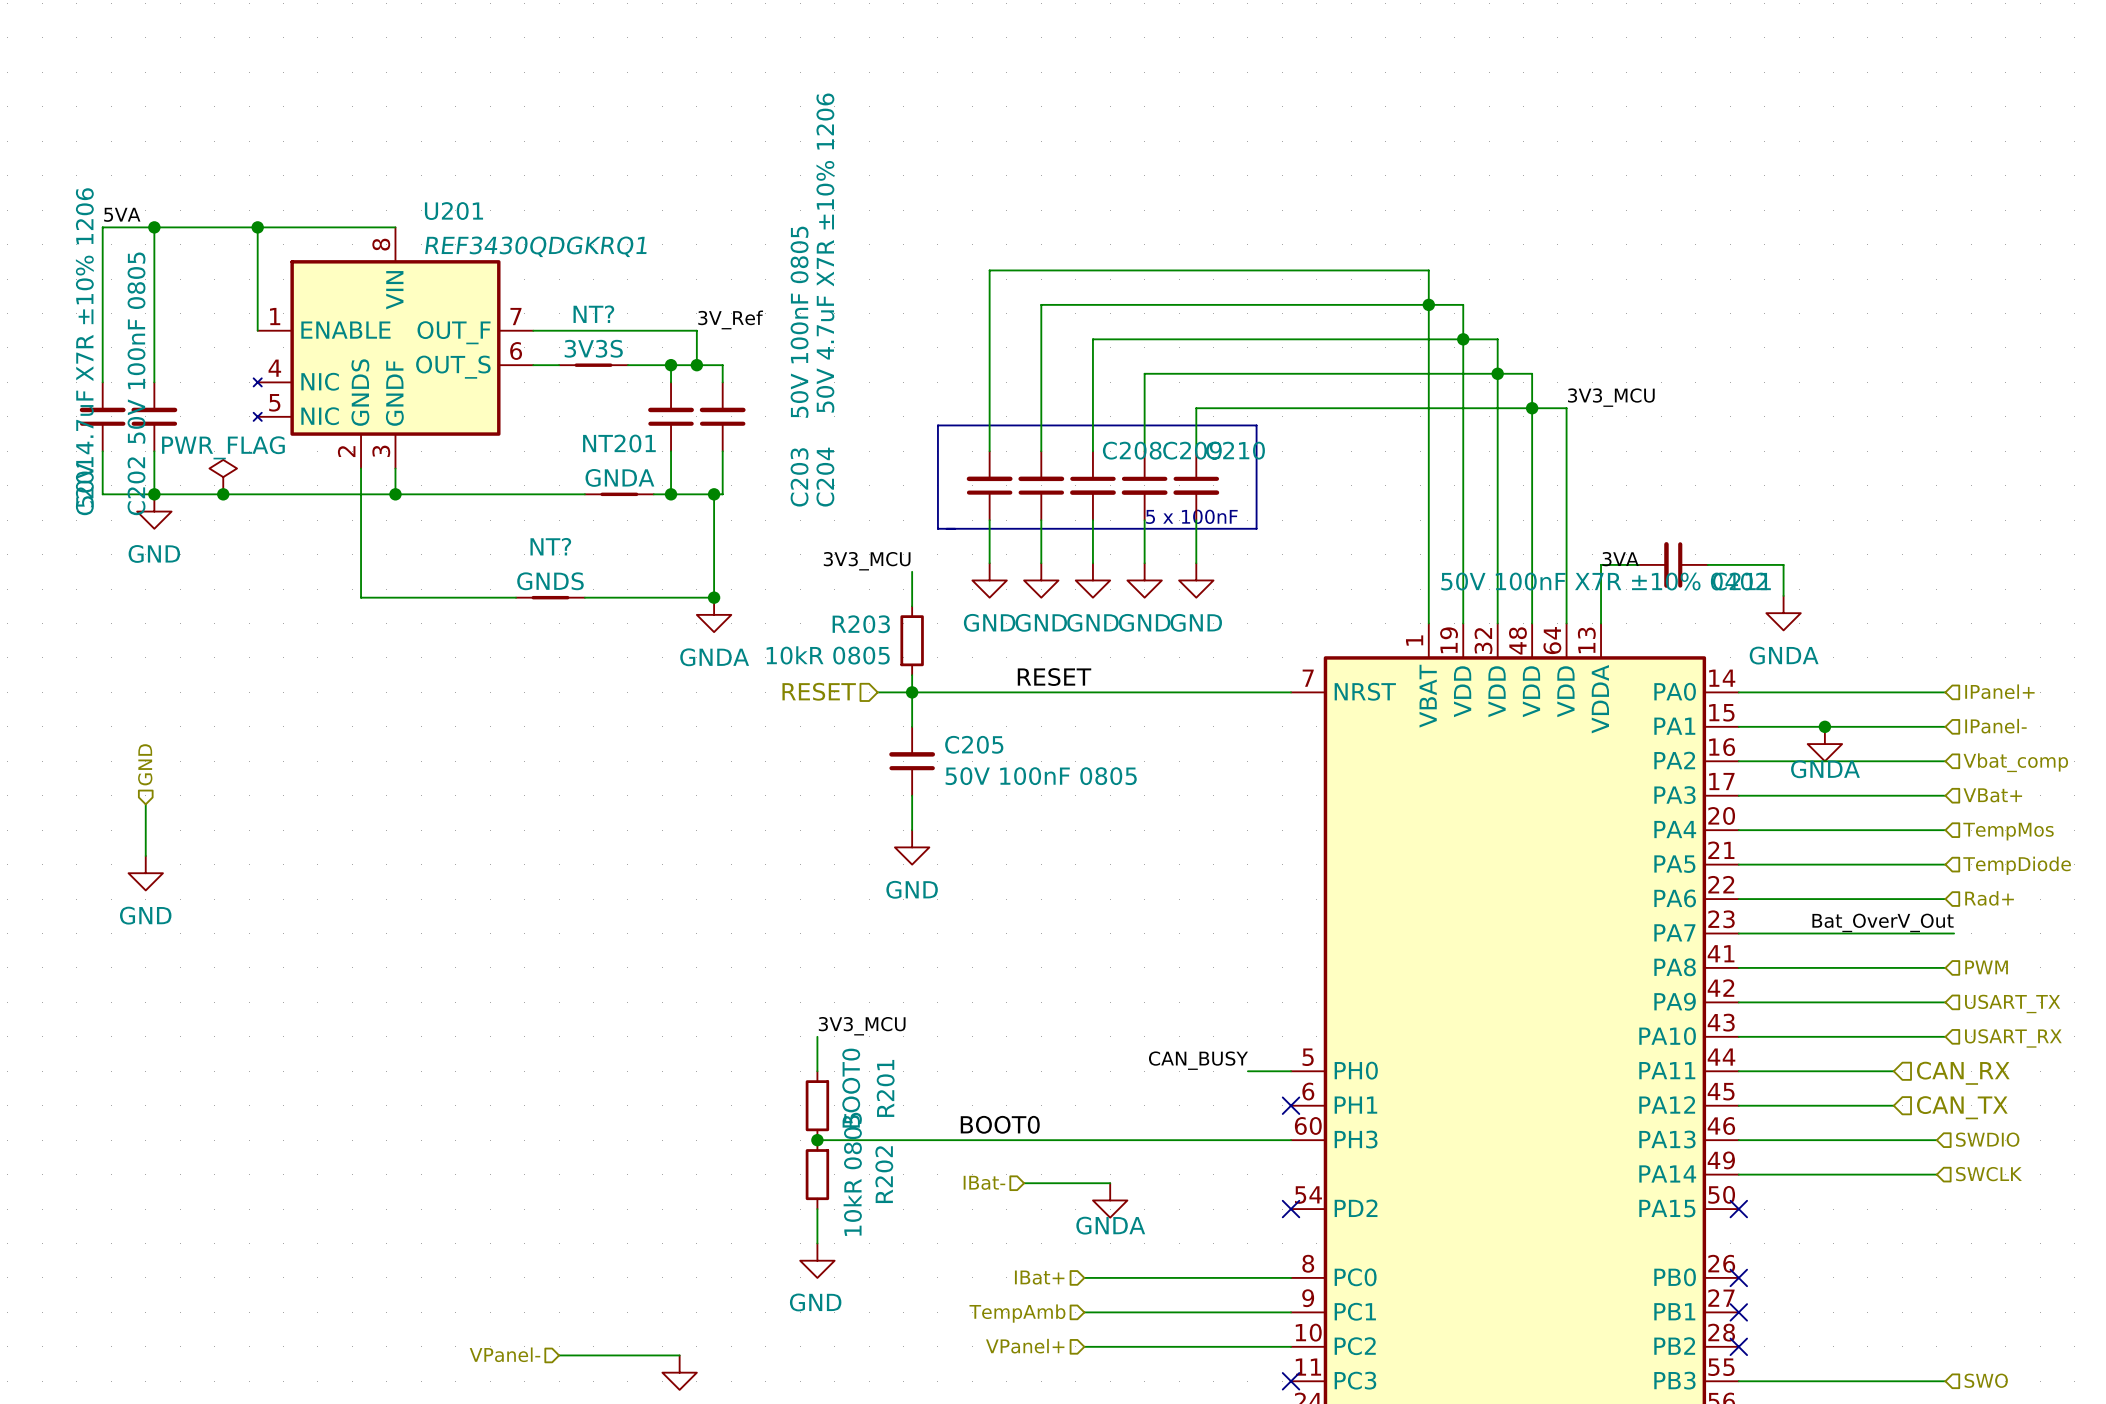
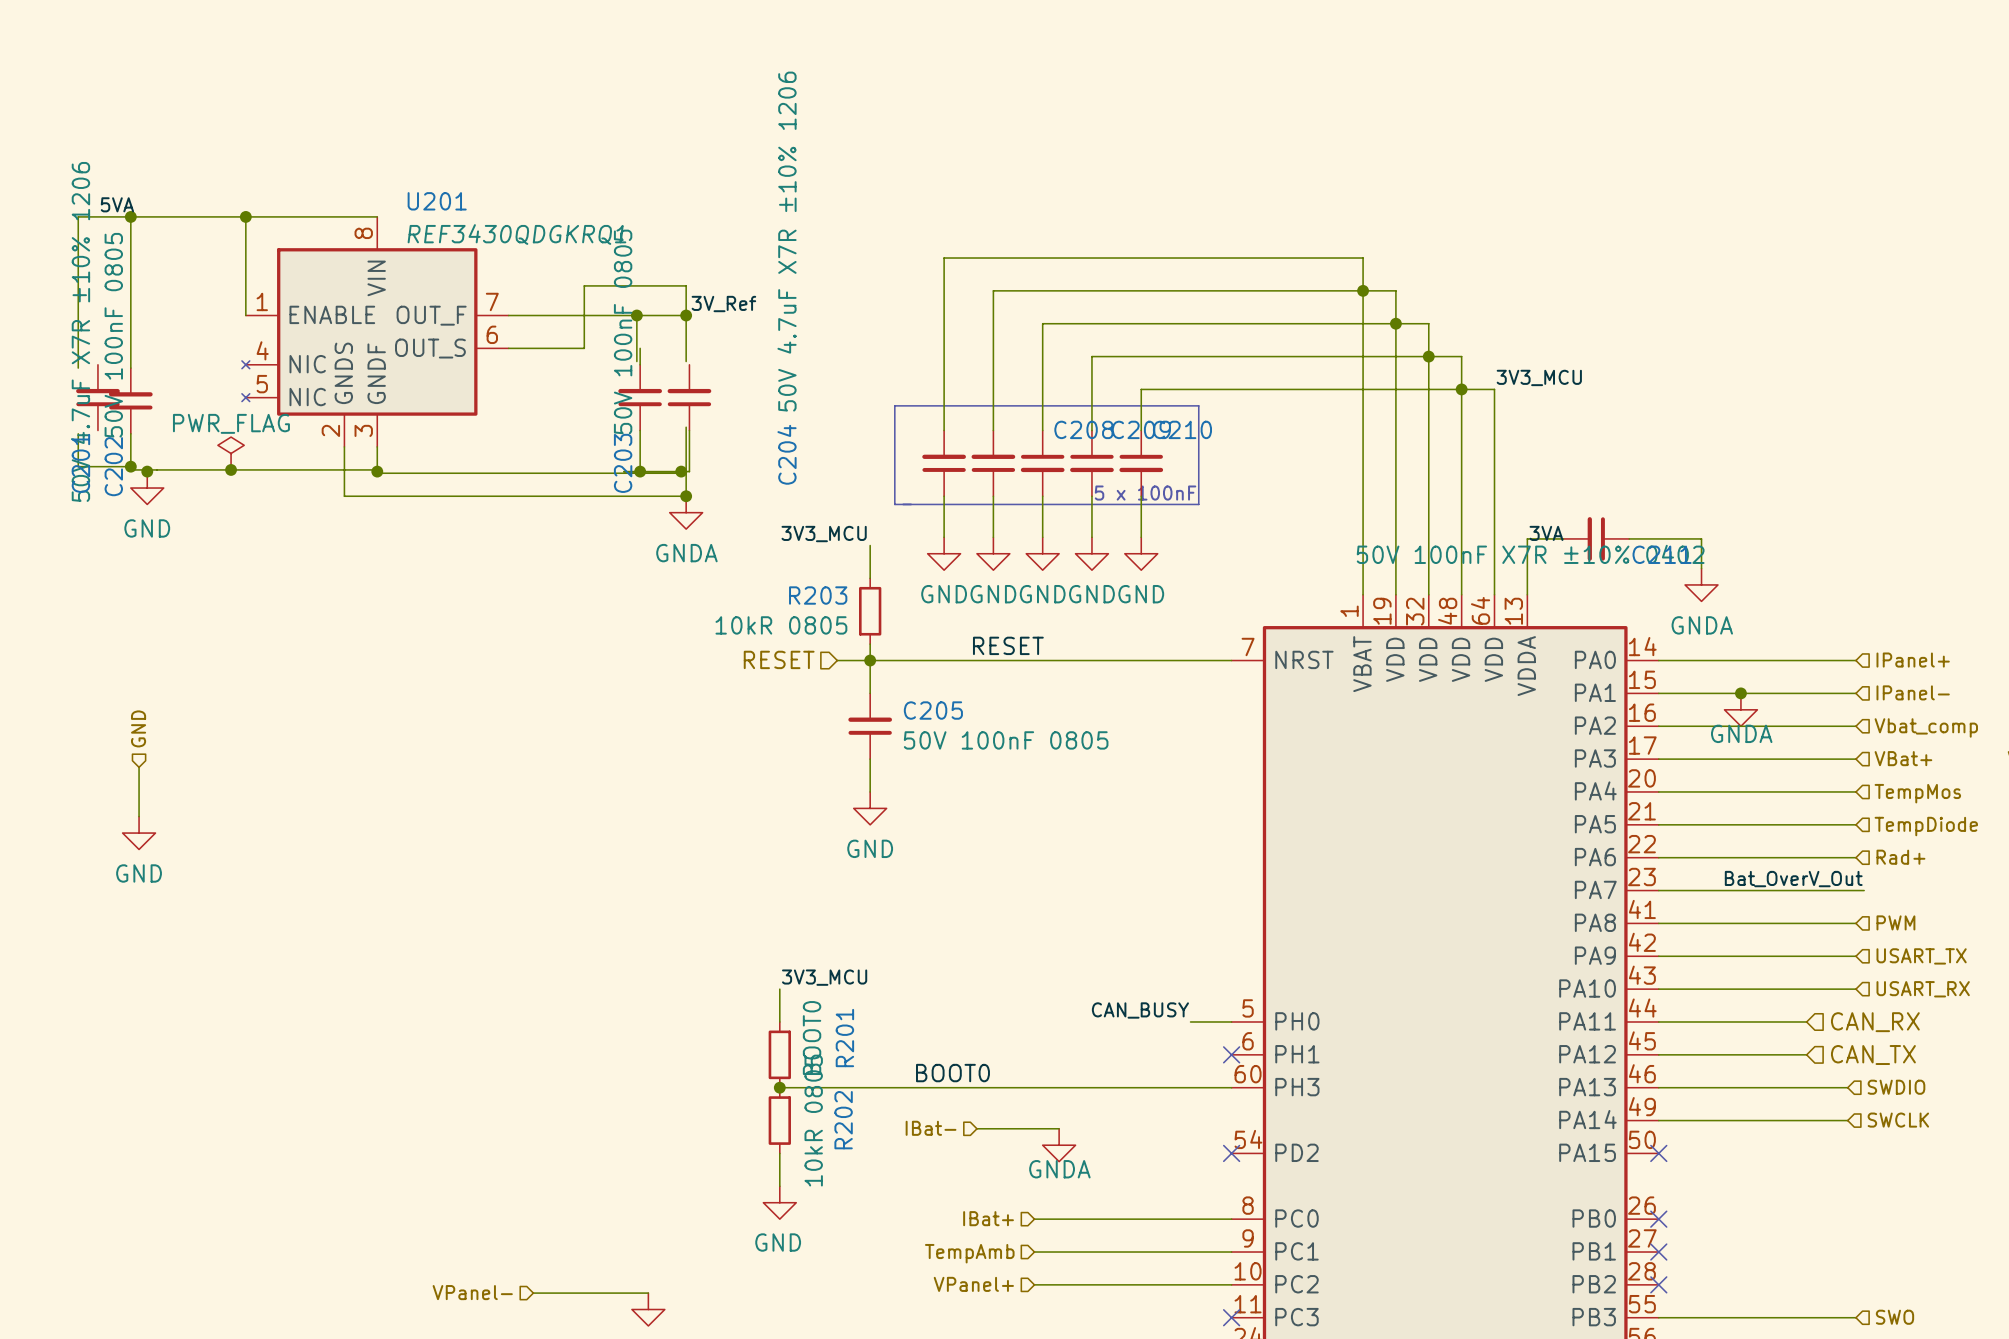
wire: (102, 227) (102, 382) -> (97, 216) (78, 216) (78, 368)
wire: none -> (130, 216) (130, 368)
wire: (154, 227) (154, 382) -> none
junction position: (154, 227) -> (130, 216)
label position: 3V_Ref (730, 319) -> 3V_Ref (723, 304)
C203 value position: 50V 100nF 0805 (799, 322) -> 50V 100nF 0805 (623, 331)
wire: none -> (636, 315) (636, 361)
junction: none -> (636, 315)
wire: (696, 330) (696, 365) -> (664, 315) (689, 315)
junction: none -> (686, 315)
wire: none -> (533, 348) (584, 348) (584, 285) (686, 285) (686, 361)
NT?: 3V3S (593, 365) -> none
wire: (627, 365) (722, 365) (722, 382) -> none
junction: (671, 365) -> none
junction: (696, 365) -> none
C202 position: (154, 416) -> (130, 400)
wire: (102, 451) (102, 494) (584, 494) -> none
wire: (154, 451) (154, 494) -> none
wire: none -> (78, 433) (78, 466) (130, 466)
wire: none -> (130, 433) (130, 469) (377, 469)
power symbol position: PWR_FLAG (223, 477) -> PWR_FLAG (231, 453)
C203 name position: C203 (799, 477) -> C203 (623, 463)
junction: none -> (130, 466)
junction position: (223, 494) -> (231, 469)
wire: none -> (377, 471) (377, 473) (686, 473)
NT201: GNDA (619, 494) -> none
wire: (714, 494) (714, 597) (584, 597) -> none
wire: (361, 520) (361, 597) (516, 597) -> (344, 496) (686, 496) (686, 427)
NT?: GNDS (550, 597) -> none
junction position: (714, 597) -> (686, 496)
power symbol position: GNDA (714, 614) -> GNDA (686, 512)

